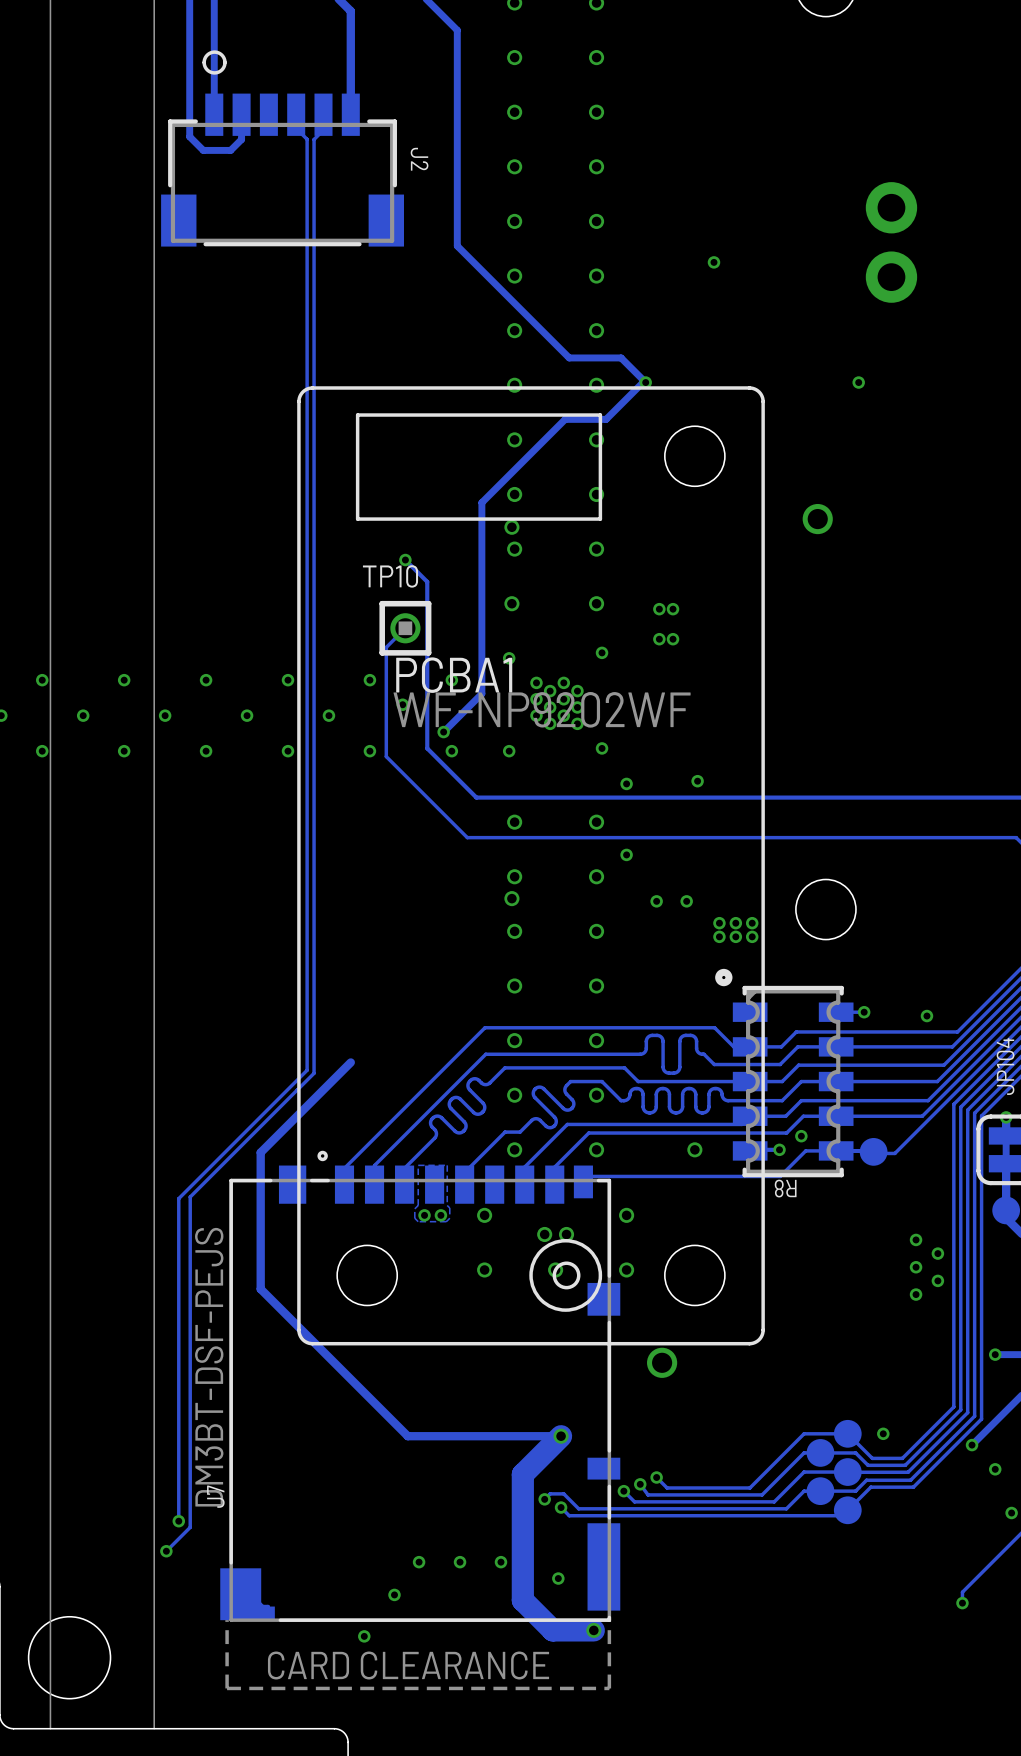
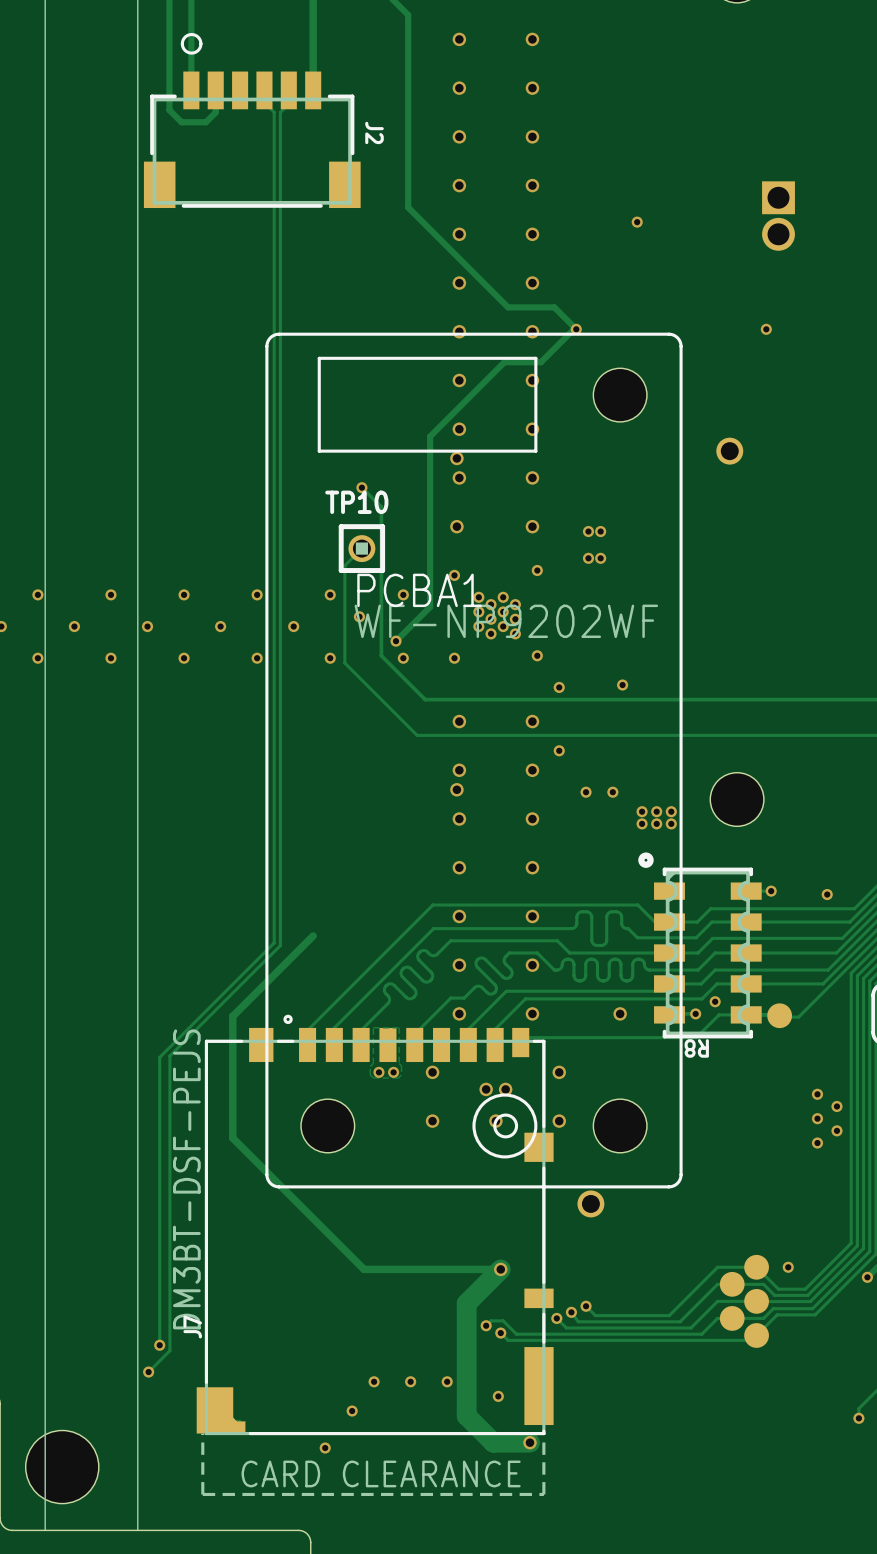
part footprint: [865, 182, 918, 303] -> [762, 181, 795, 251]

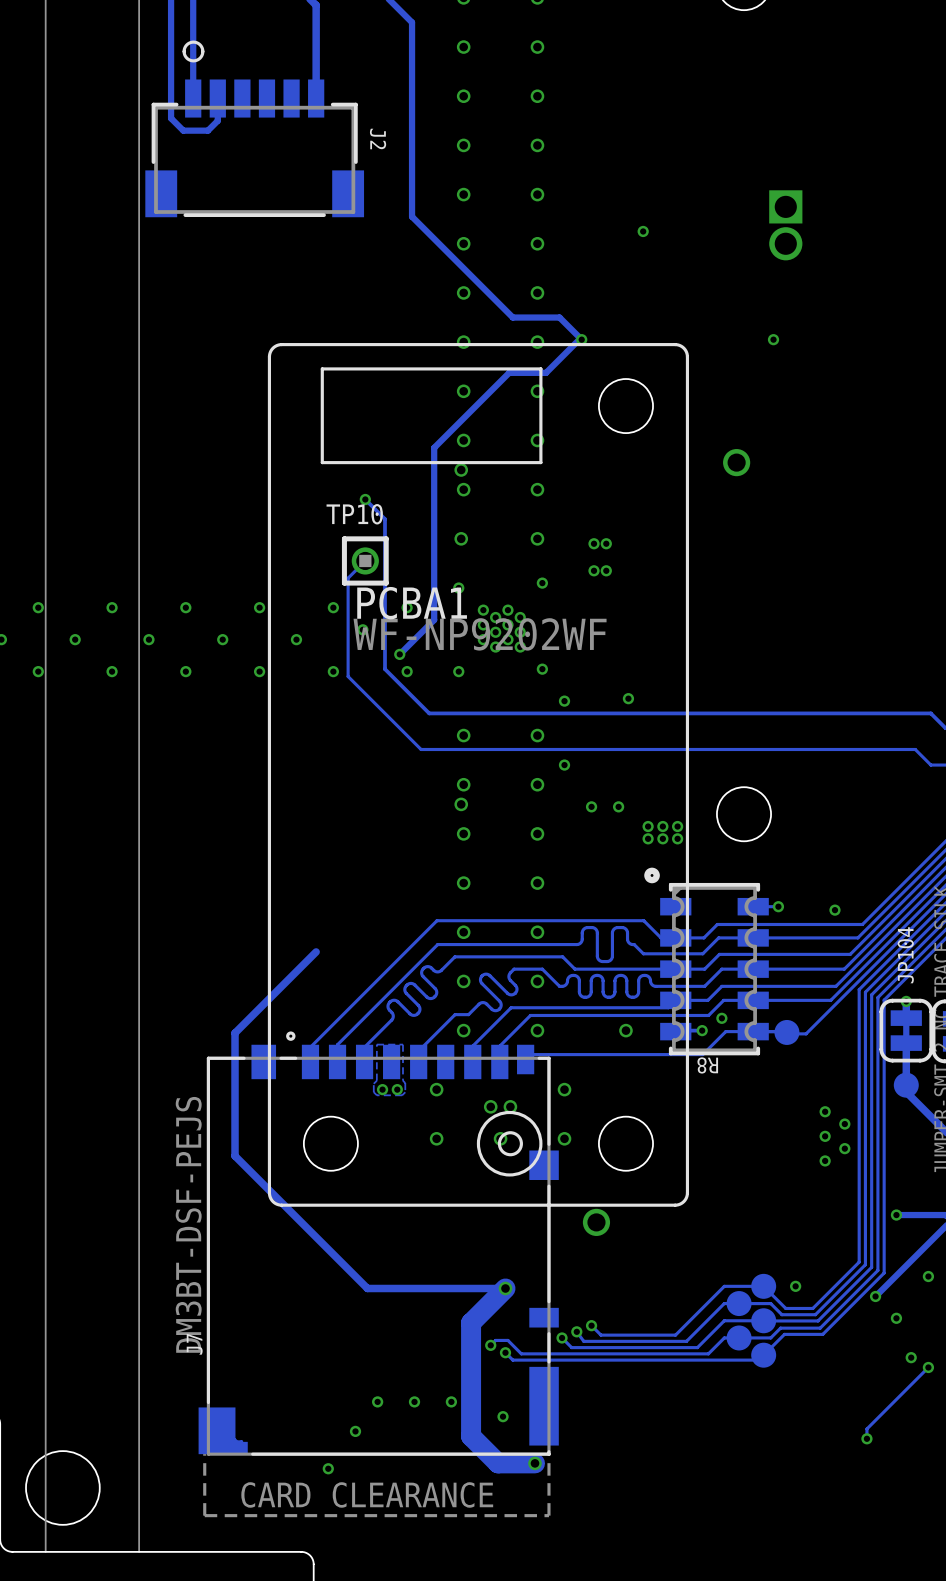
track: (264, 102) (274, 112) (274, 942) (159, 1057) (159, 1345) -> none
track: (288, 105) (280, 112) (280, 945) (169, 1055) (169, 1350) (148, 1372) -> none
via: (159, 1345) -> none
via: (148, 1372) -> none

